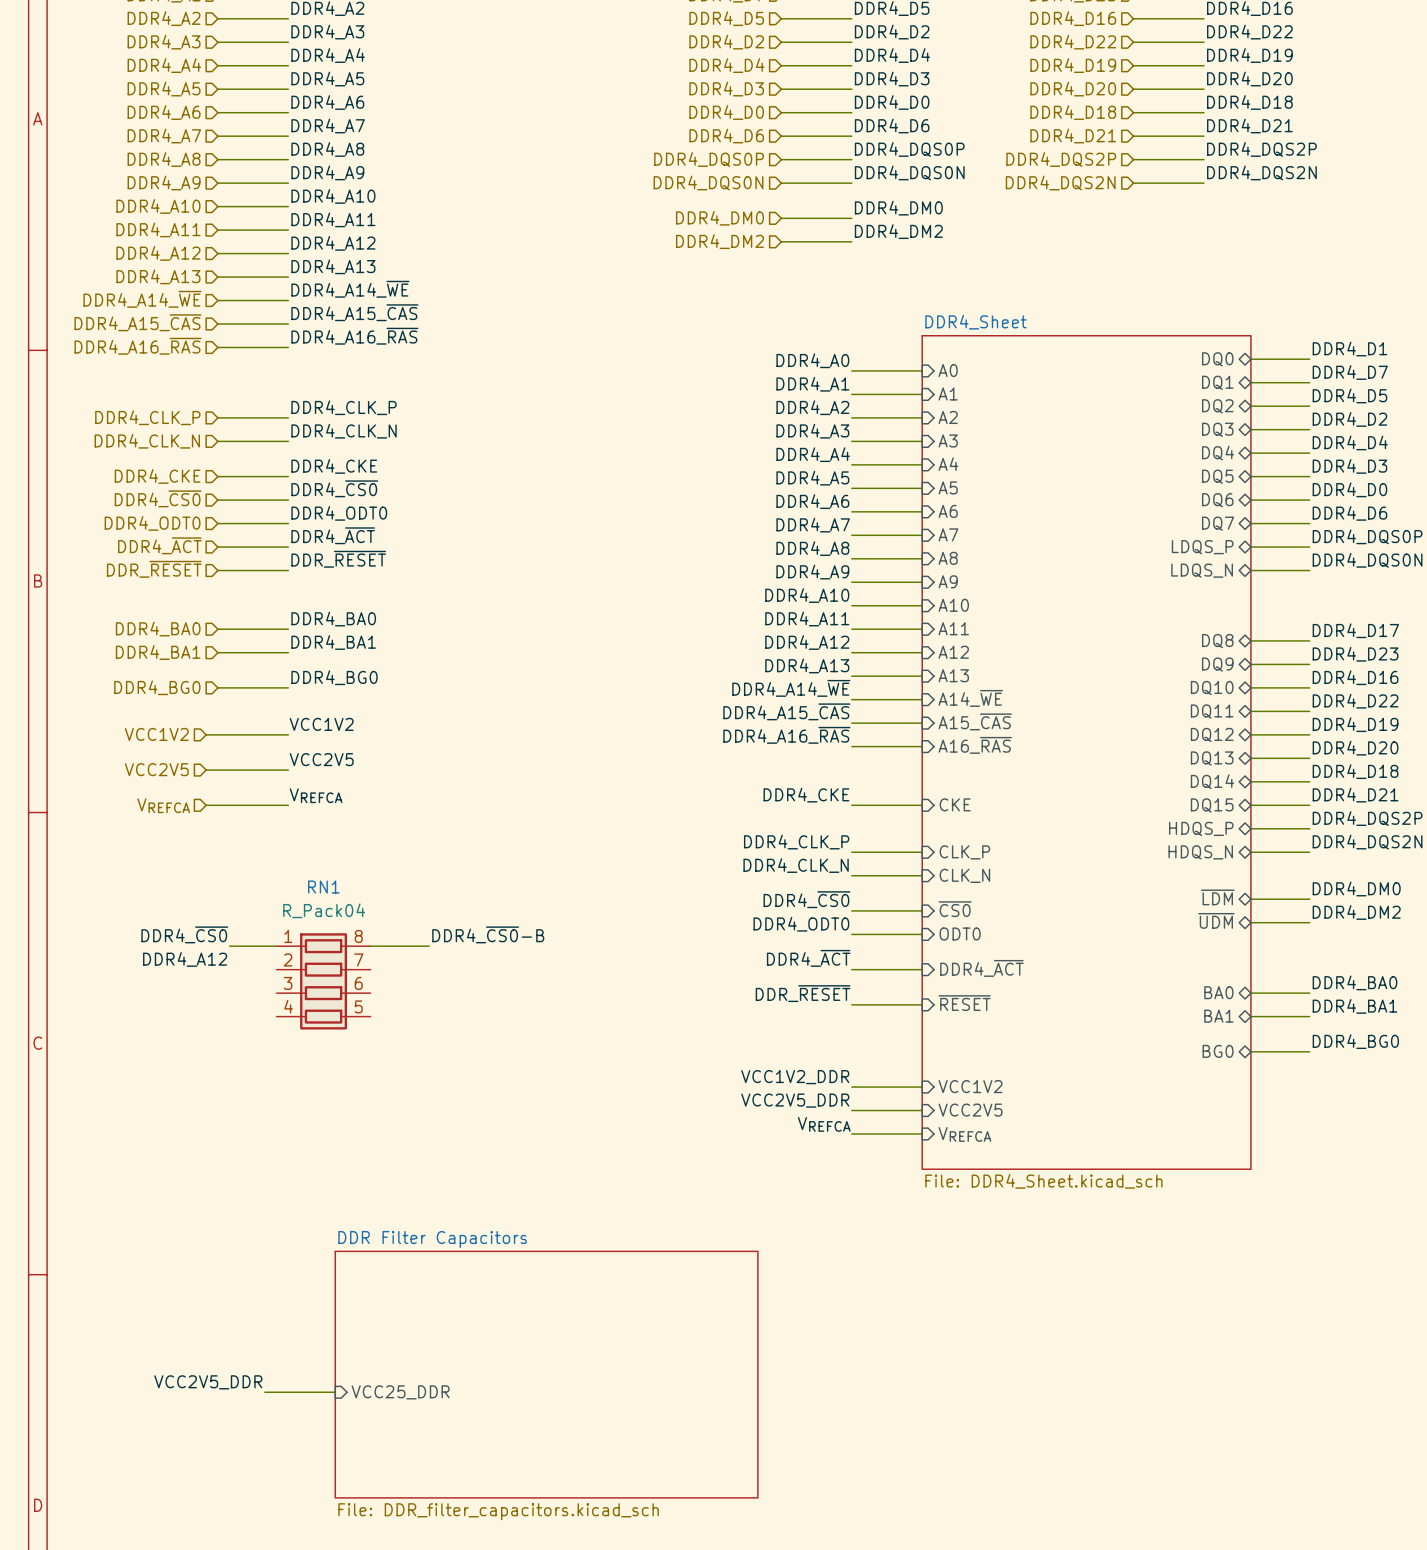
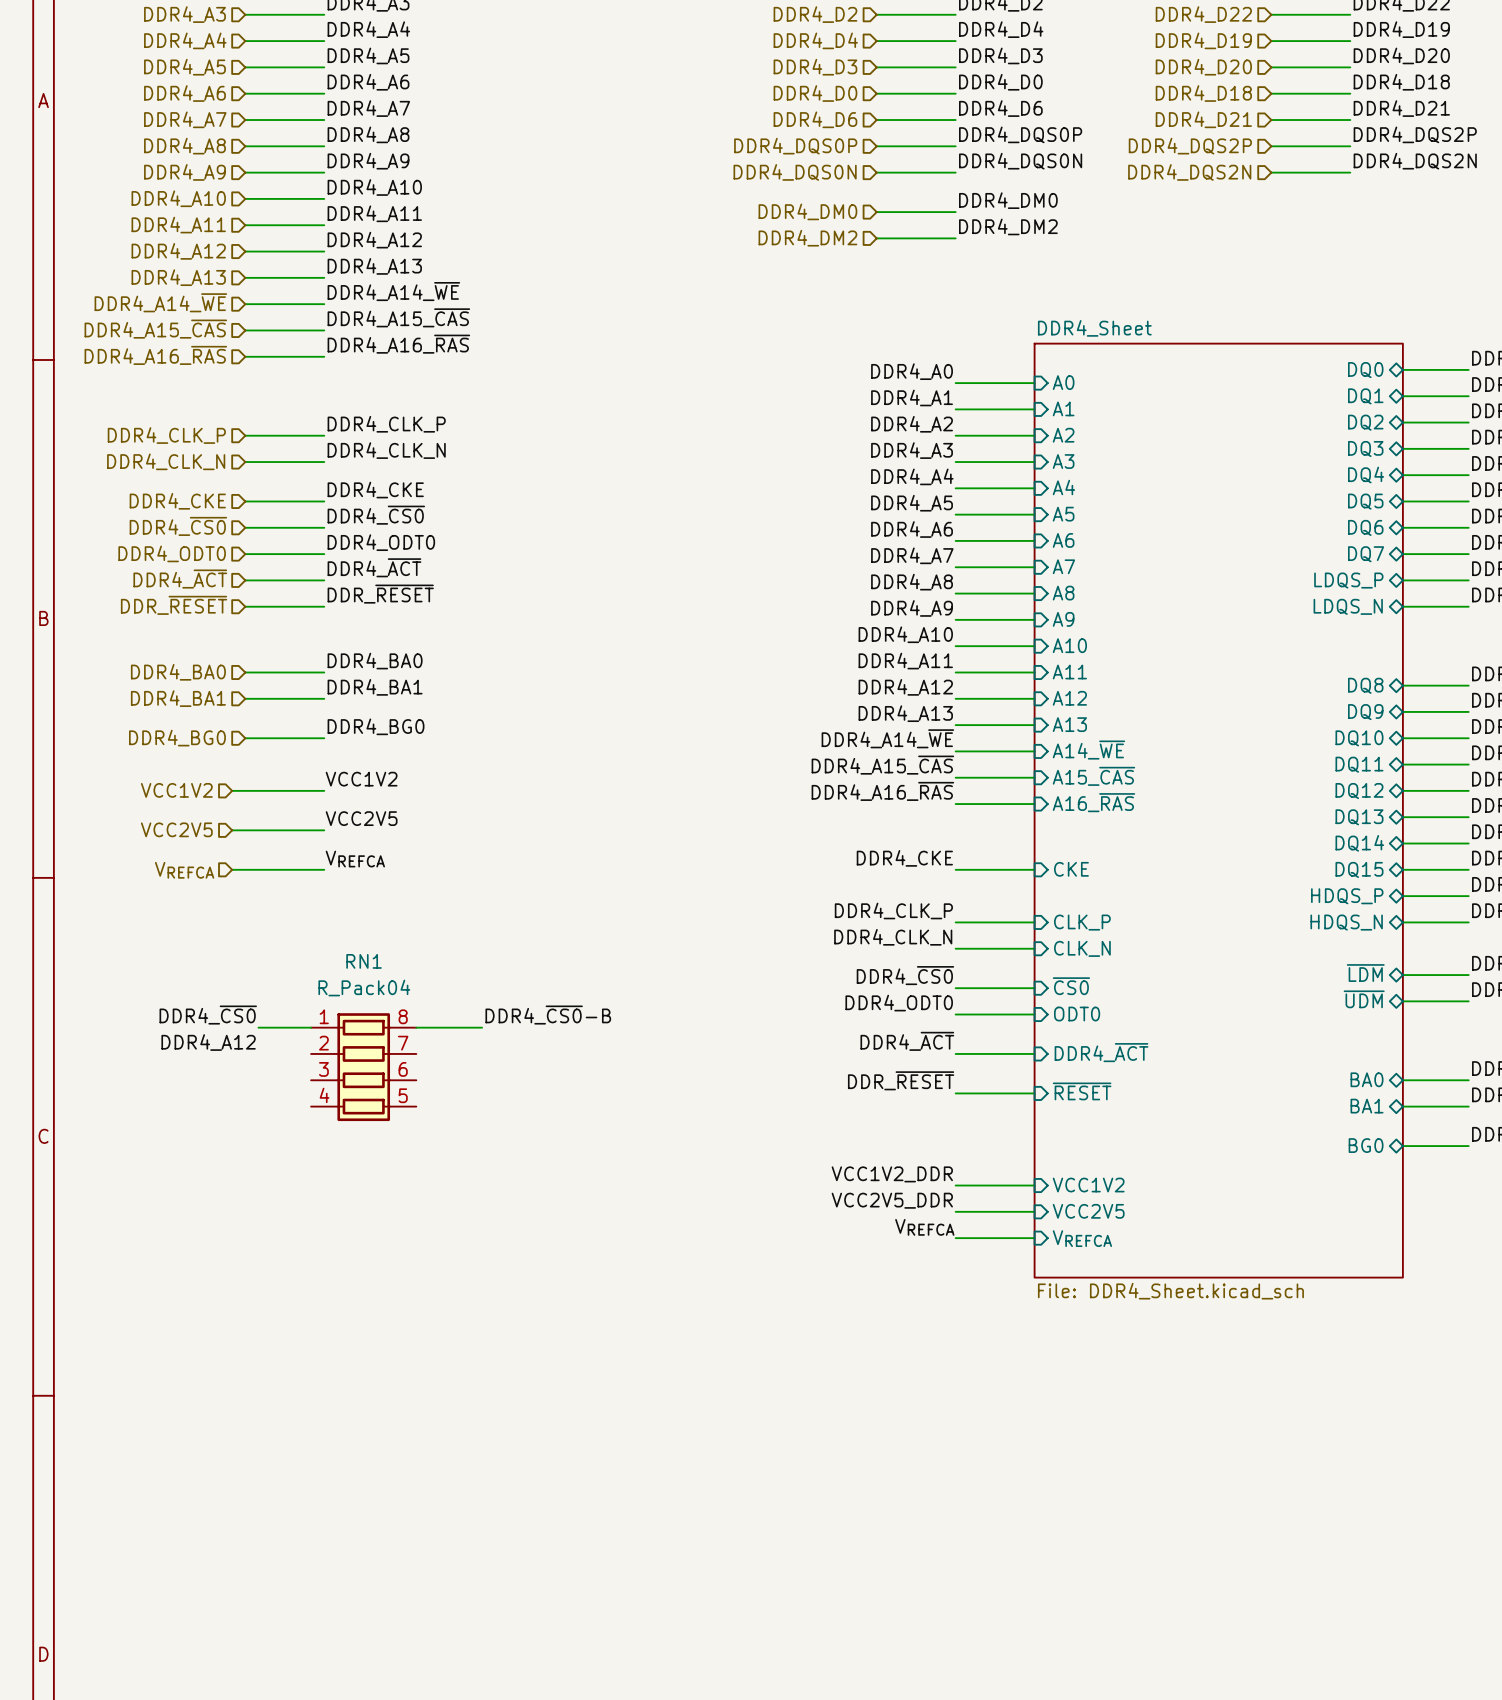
sheet DDR Filter Capacitors: File: DDR_filter_capacitors.kicad_sch (546, 1374) -> none
label: VCC2V5_DDR (208, 1382) -> none
wire: (264, 1392) (335, 1392) -> none
sheet pin: VCC25_DDR (400, 1392) -> none

